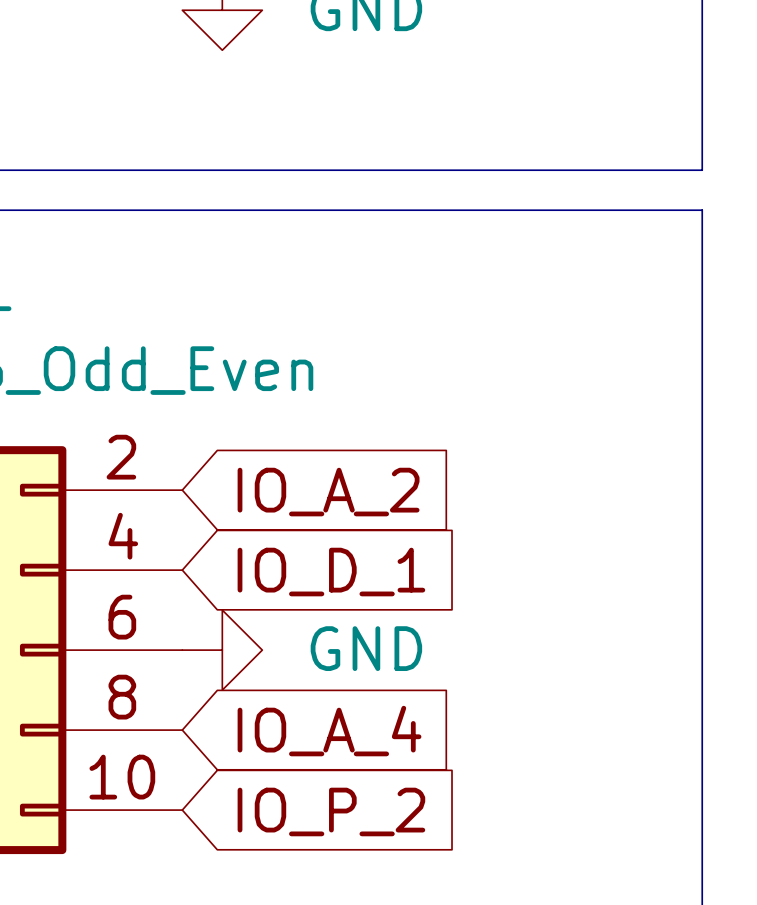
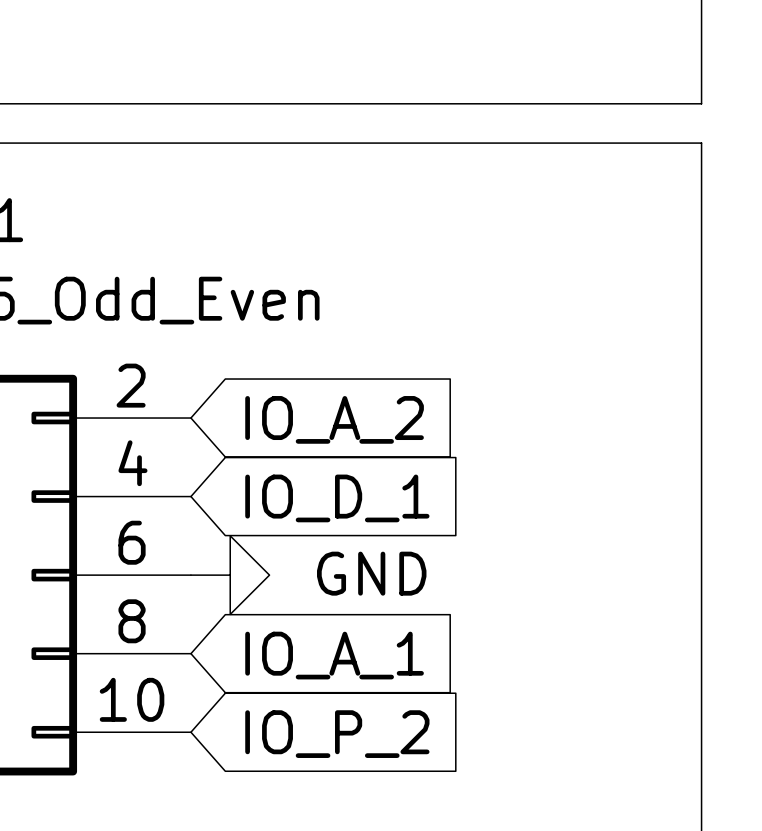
global label: IO_A_4 (329, 731) -> IO_A_1 (334, 655)

